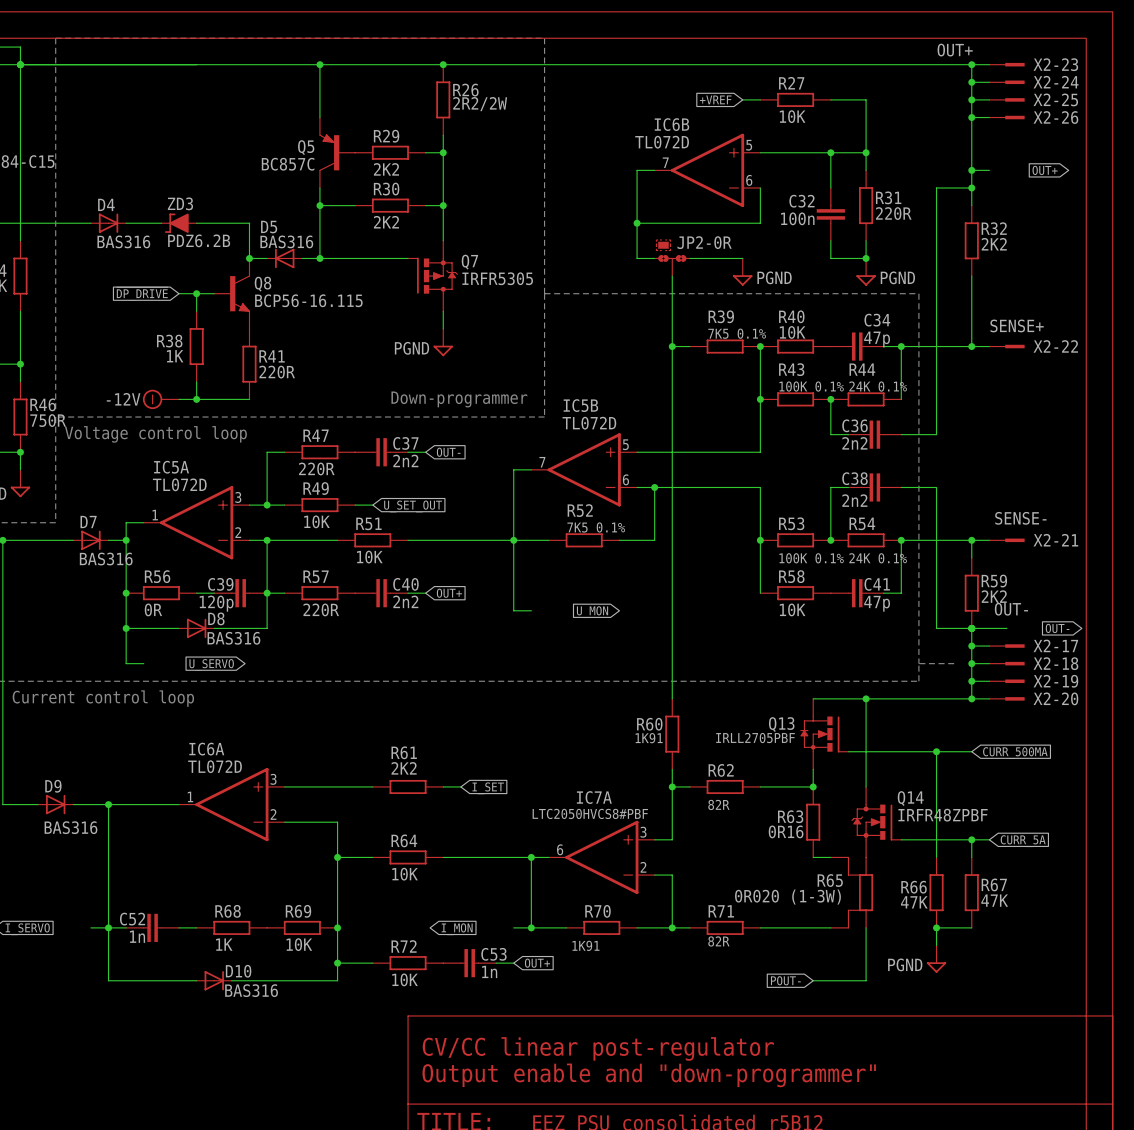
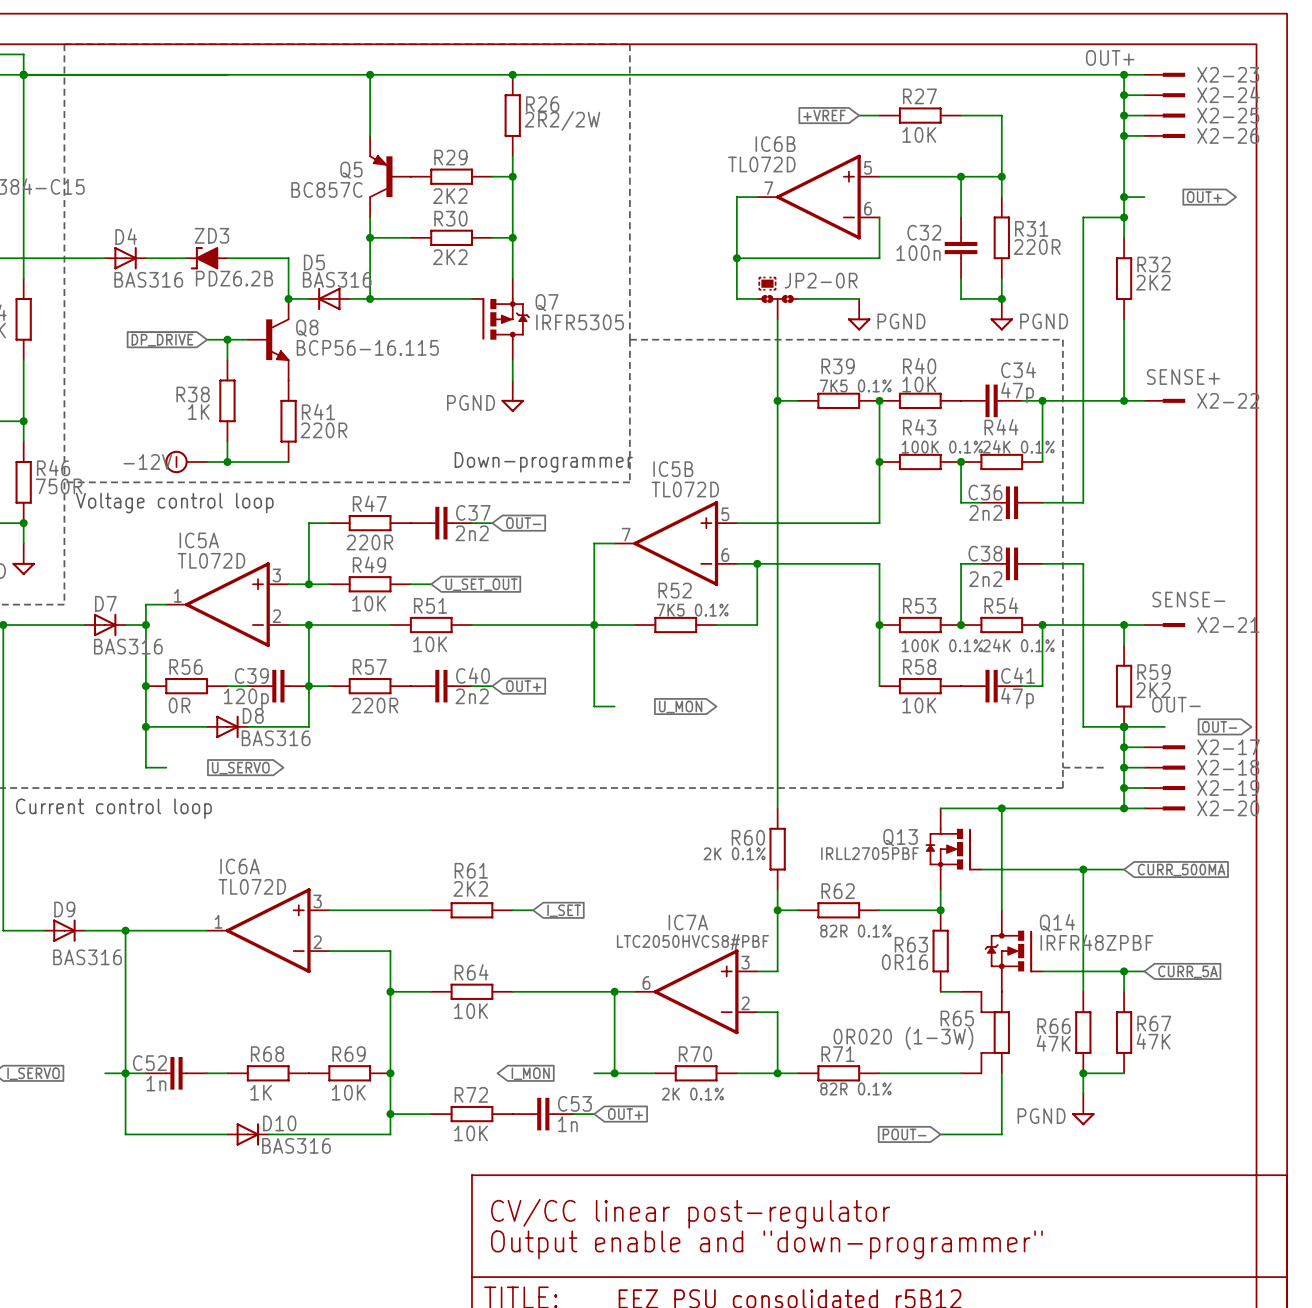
R60 value: 1K91 (649, 738) -> 2K 0.1% (734, 853)
R62 value: 82R (718, 804) -> 82R 0.1% (855, 931)
R71 value: 82R (718, 941) -> 82R 0.1% (855, 1089)
R70 value: 1K91 (585, 945) -> 2K 0.1% (692, 1094)

